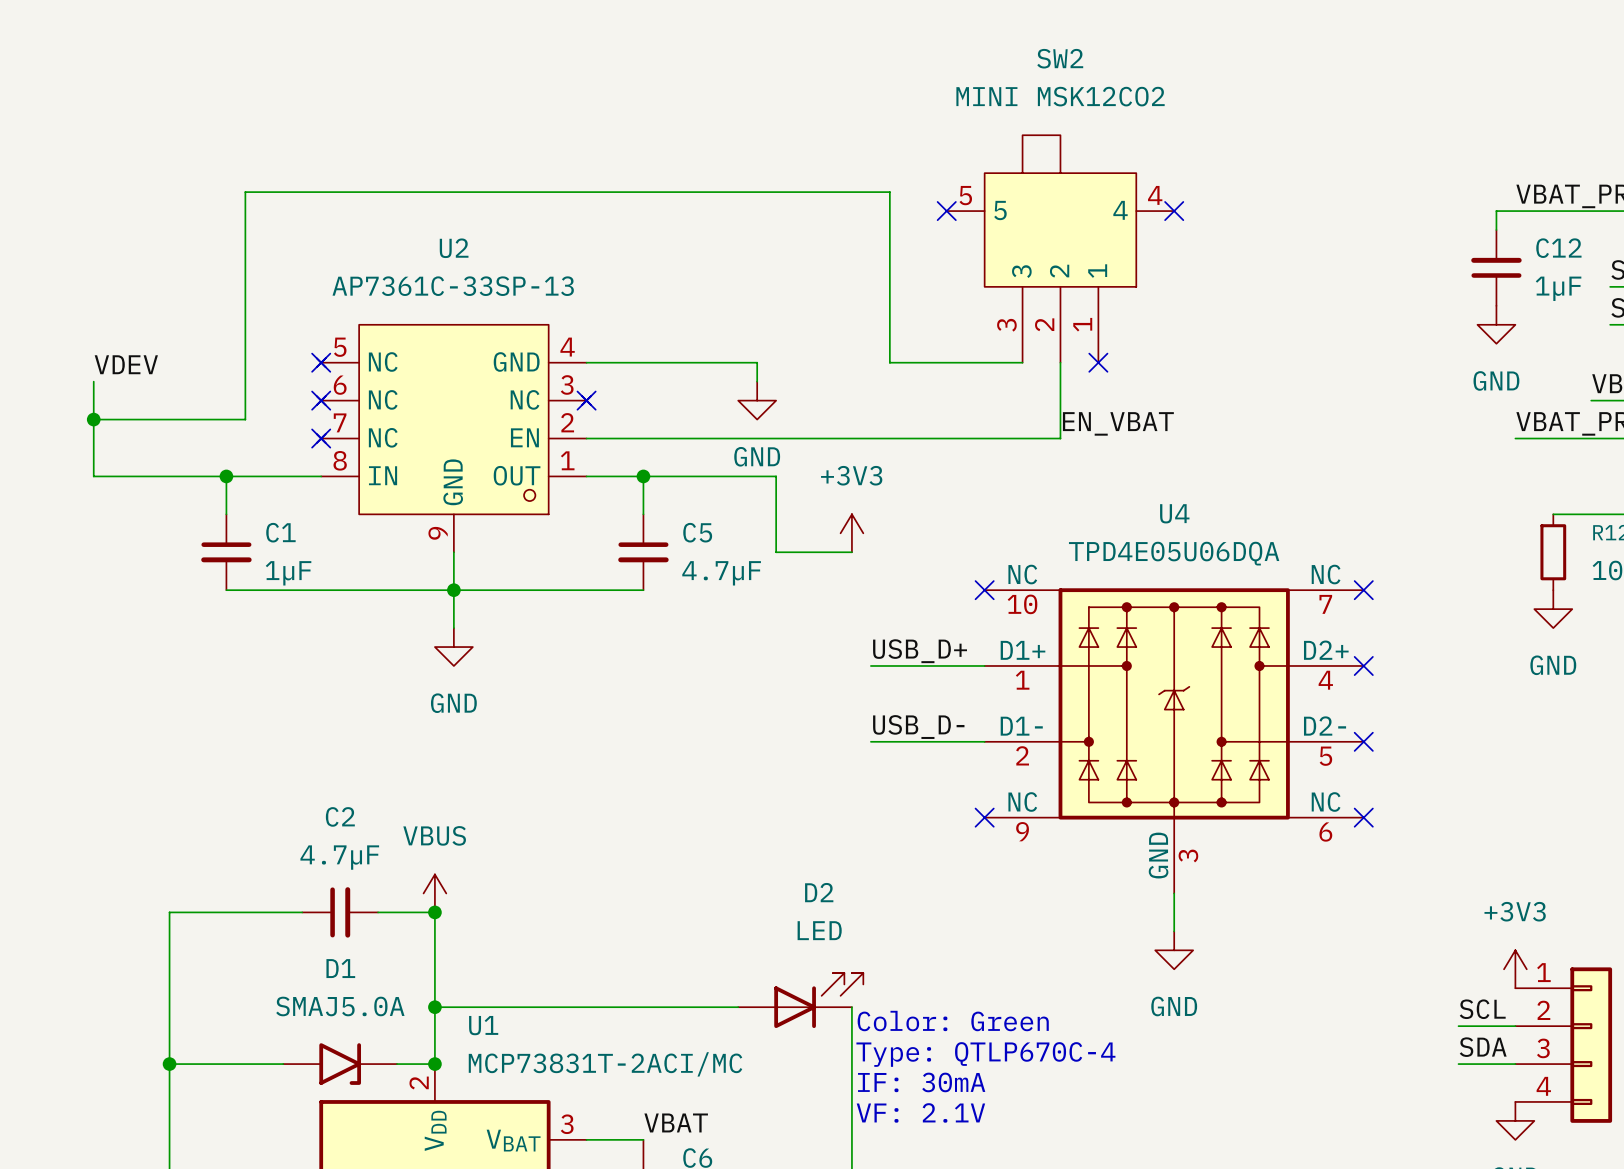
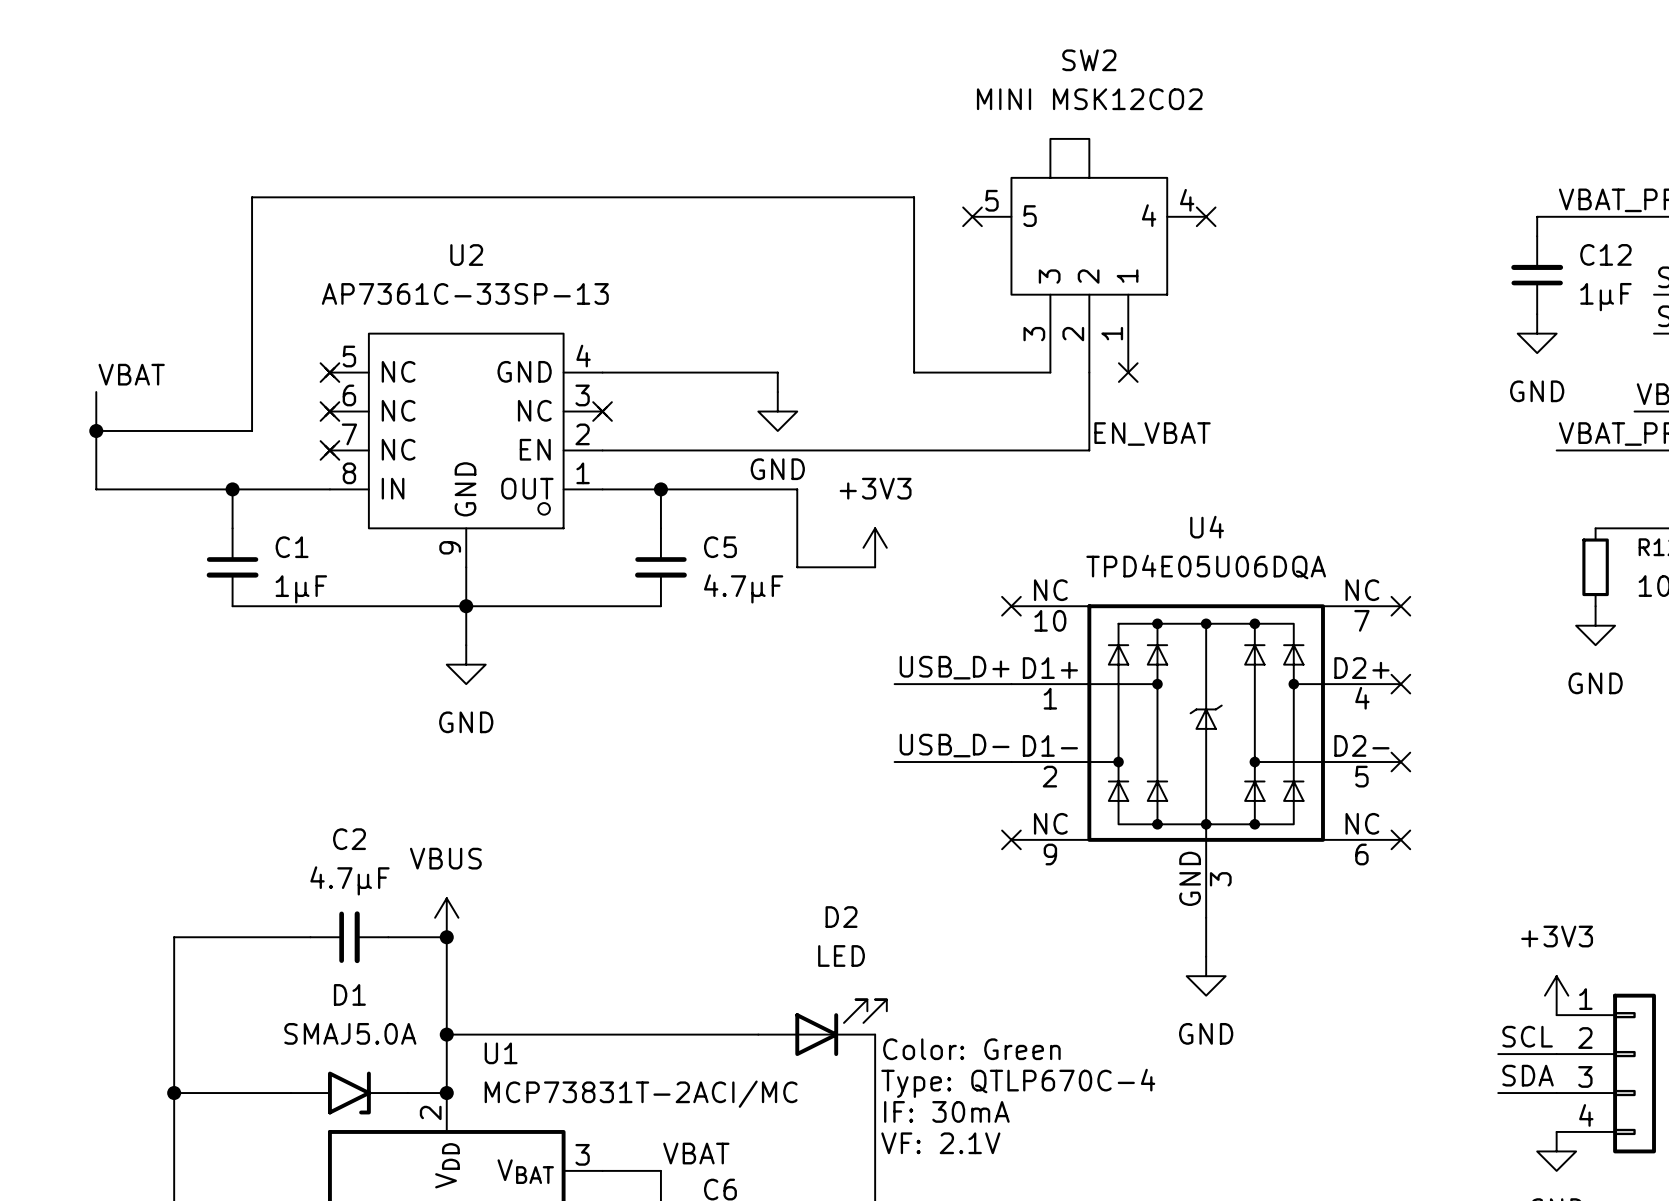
label: VDEV (126, 364) -> VBAT (131, 374)

